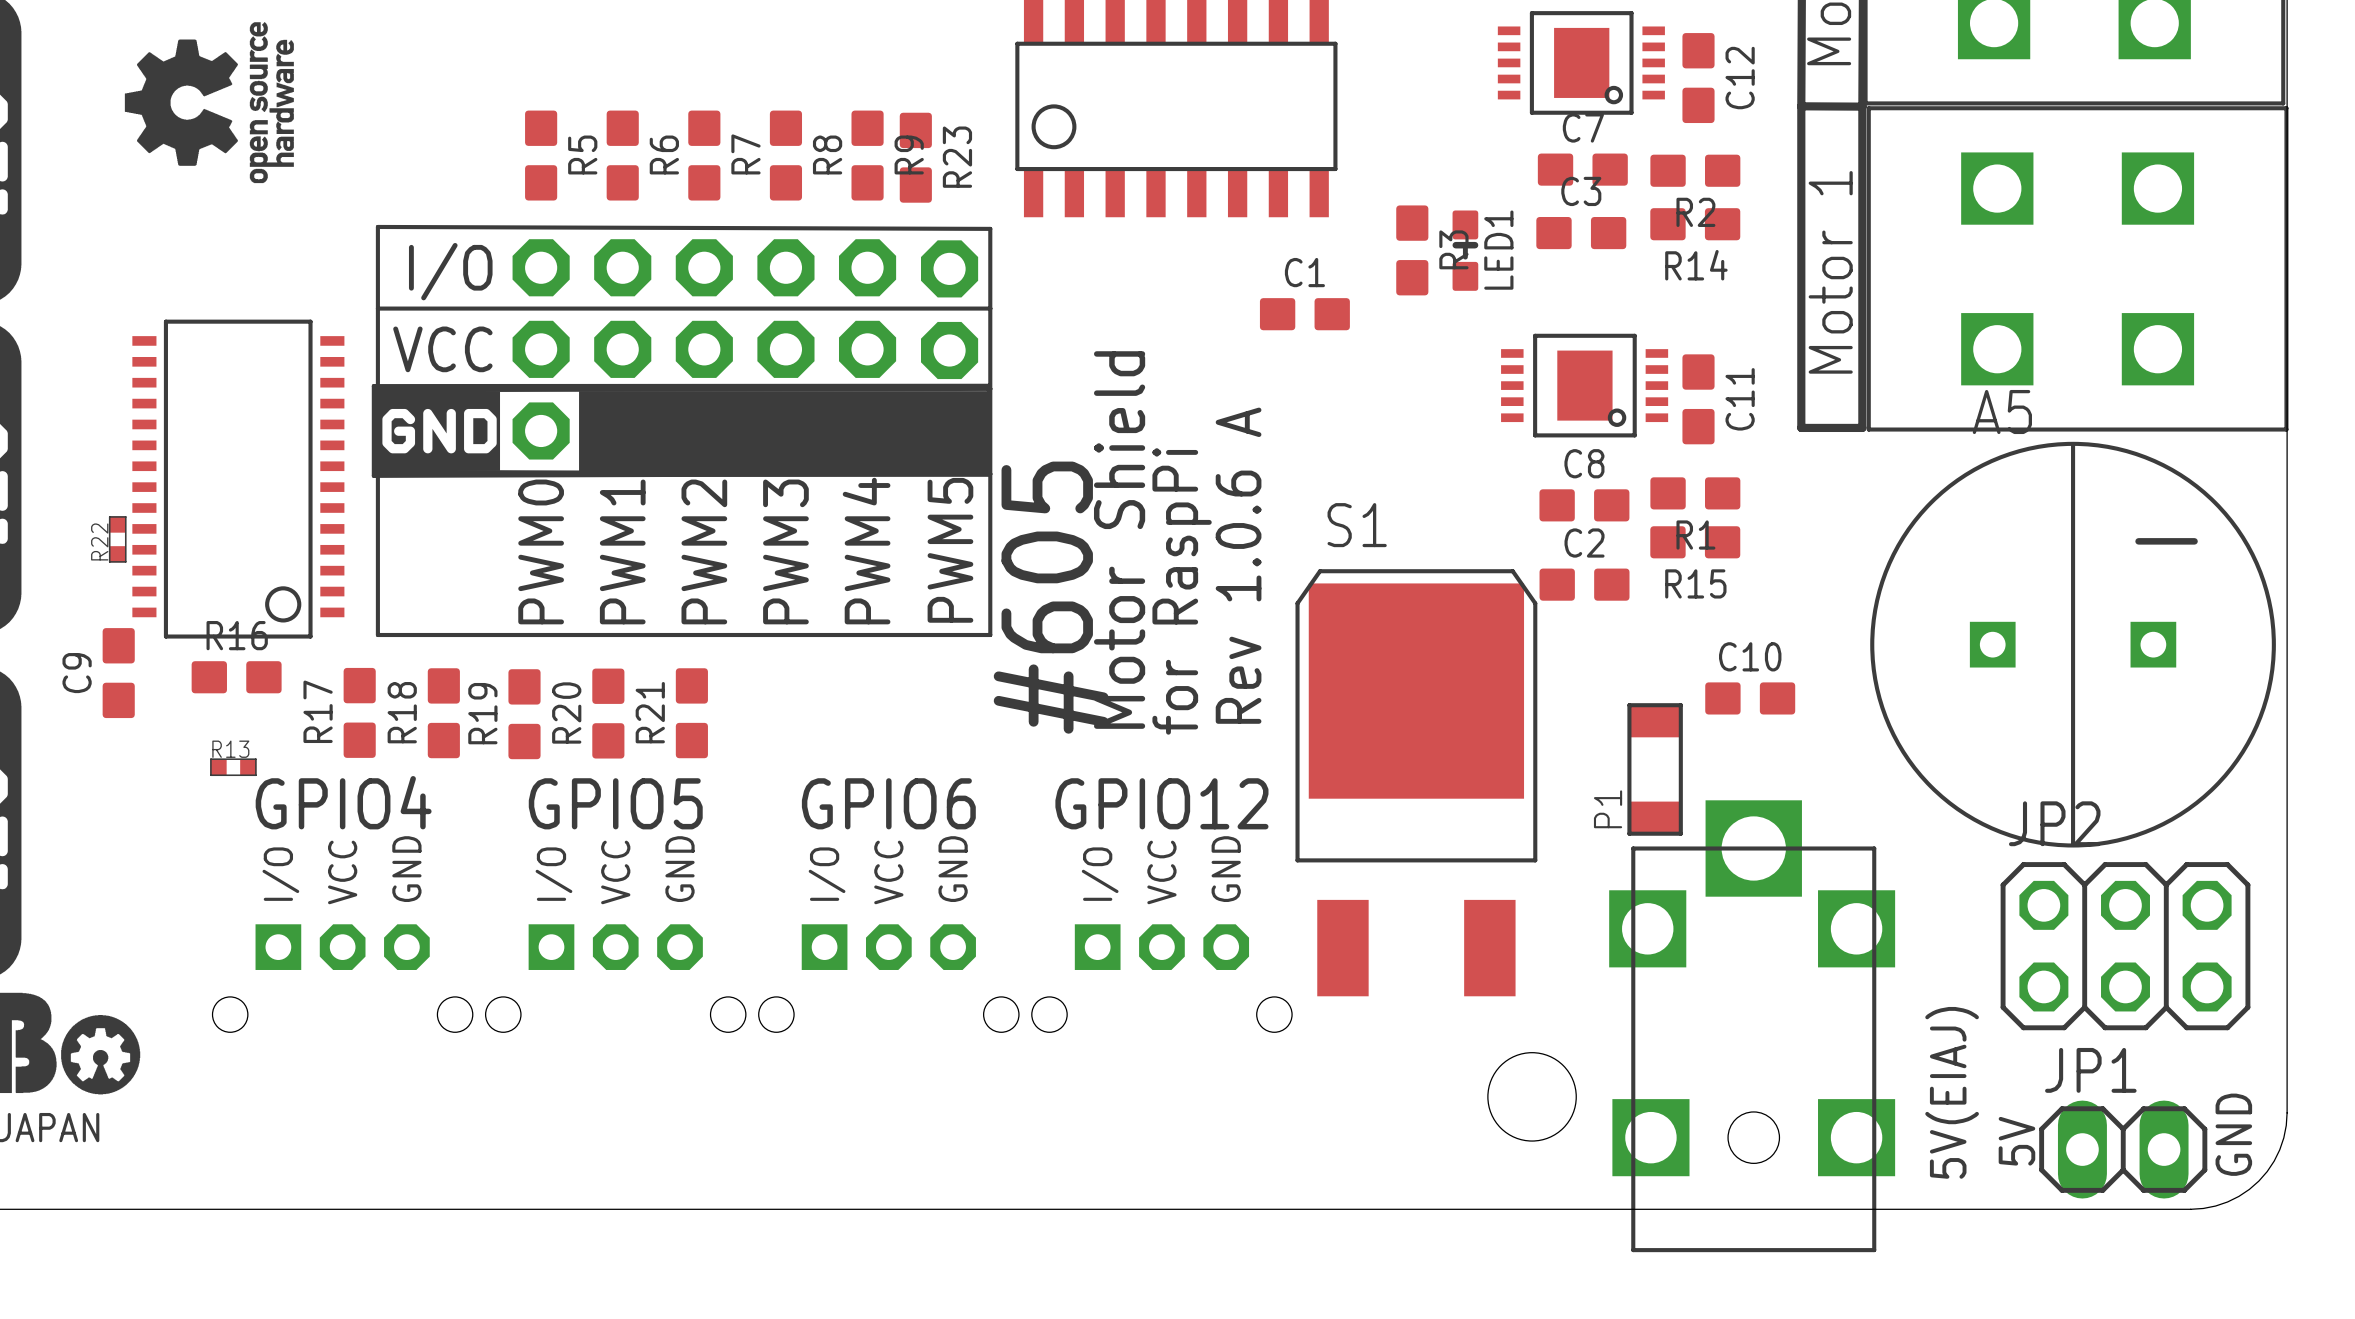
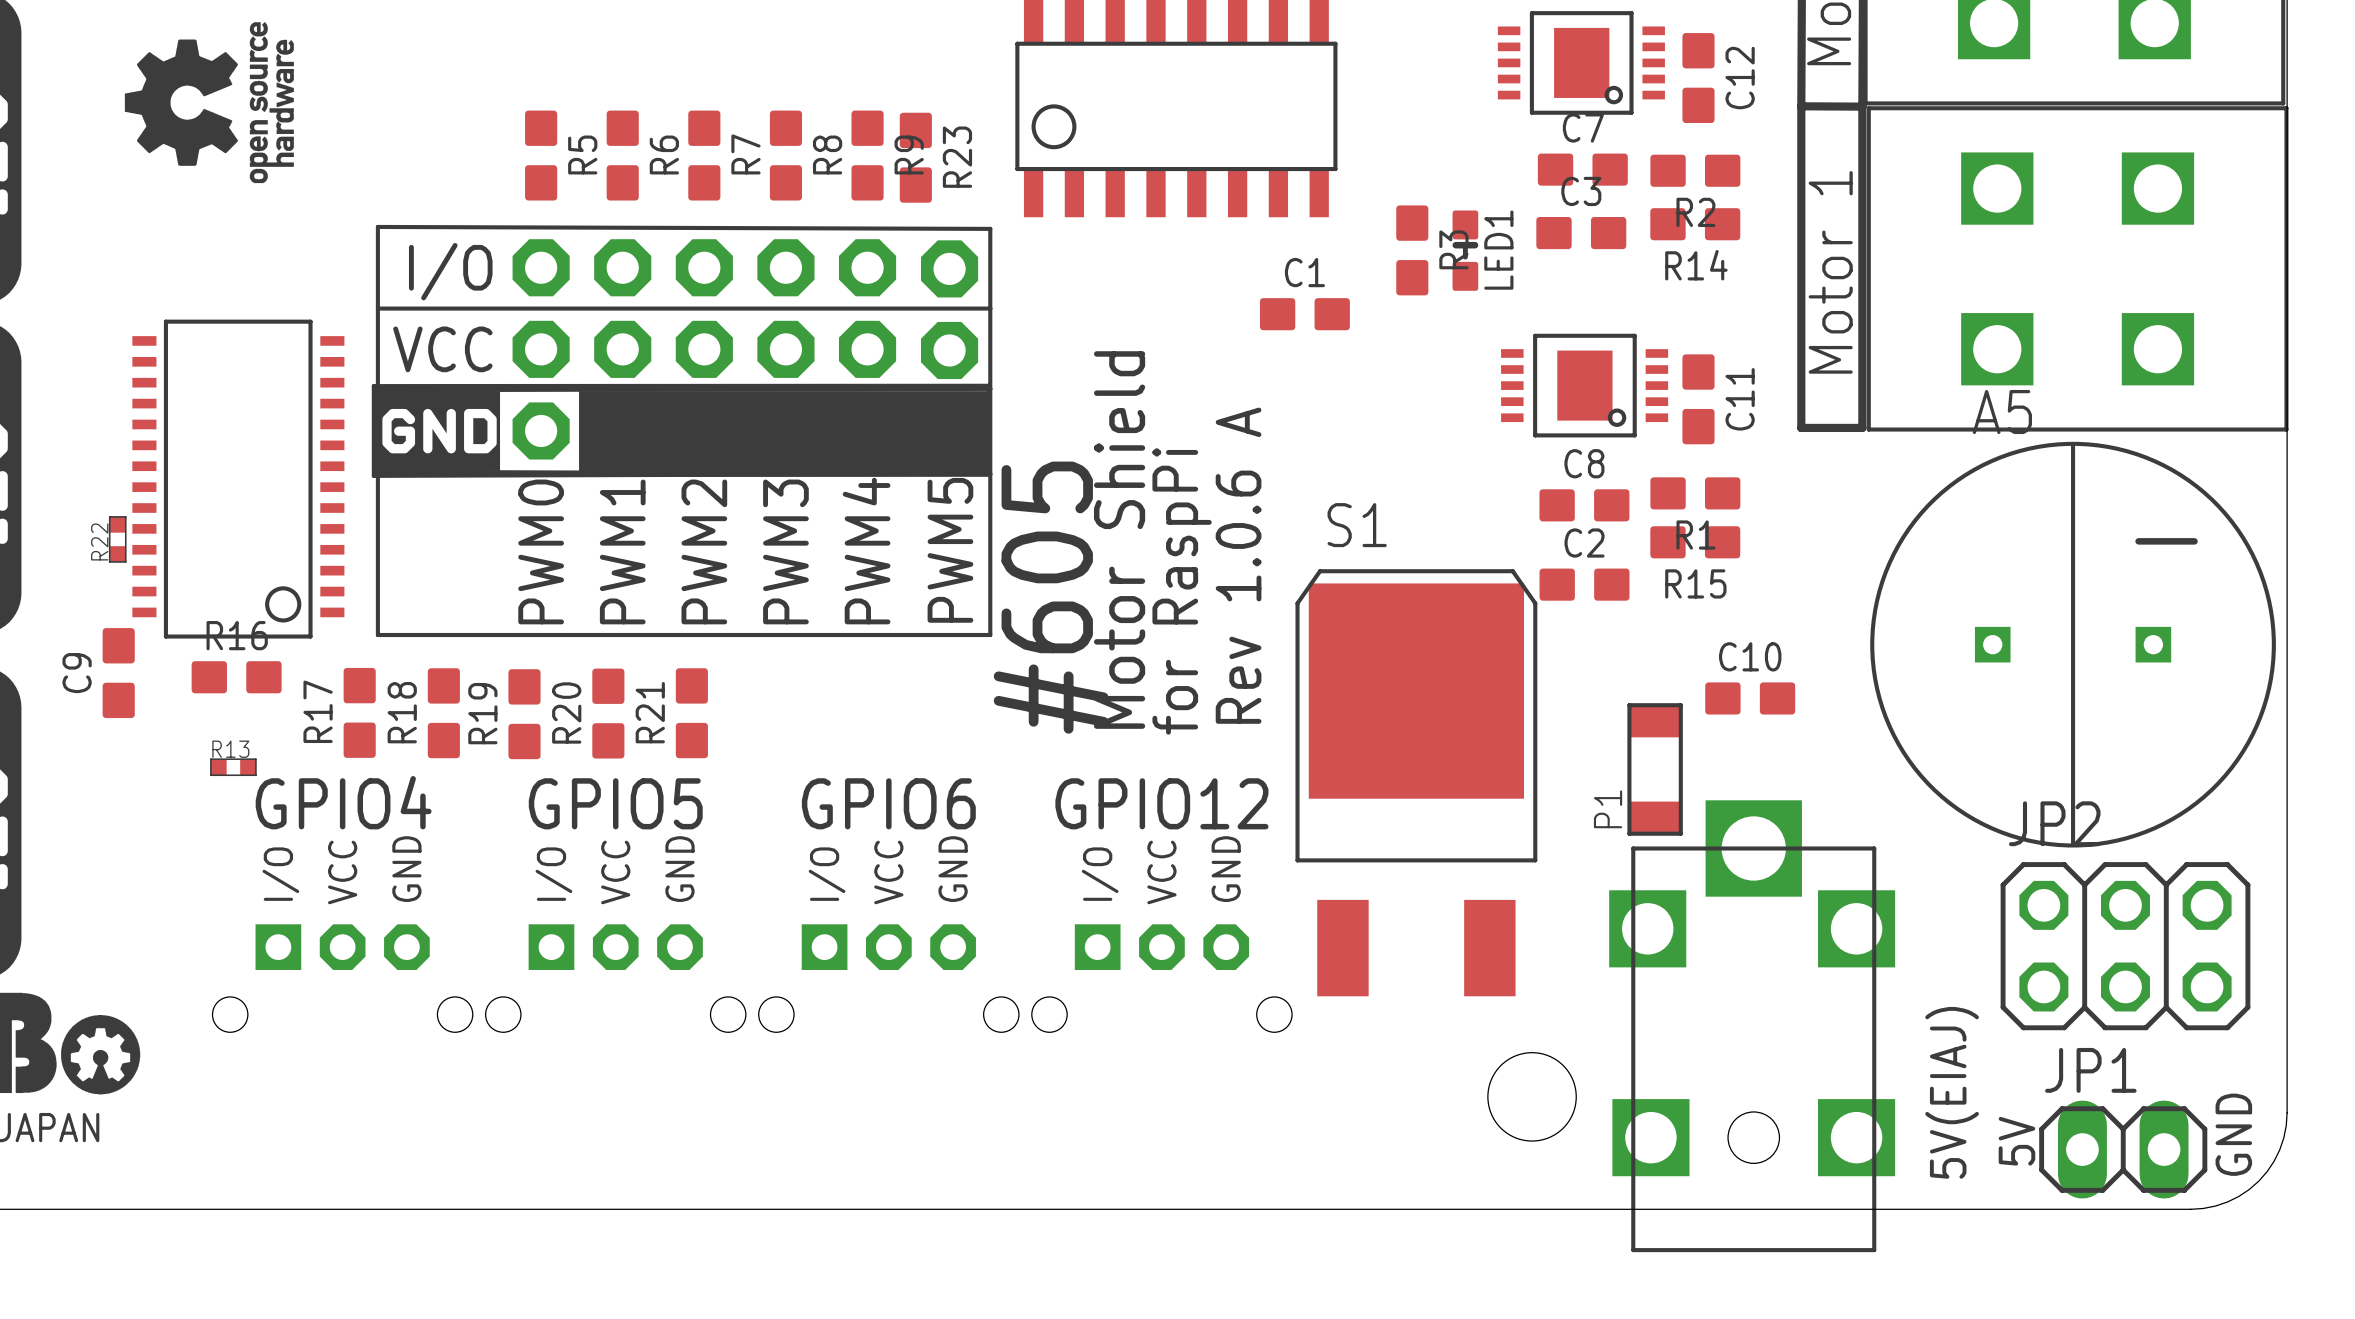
A5 footprint: [1870, 441, 2276, 848] -> [1870, 441, 2276, 848]

